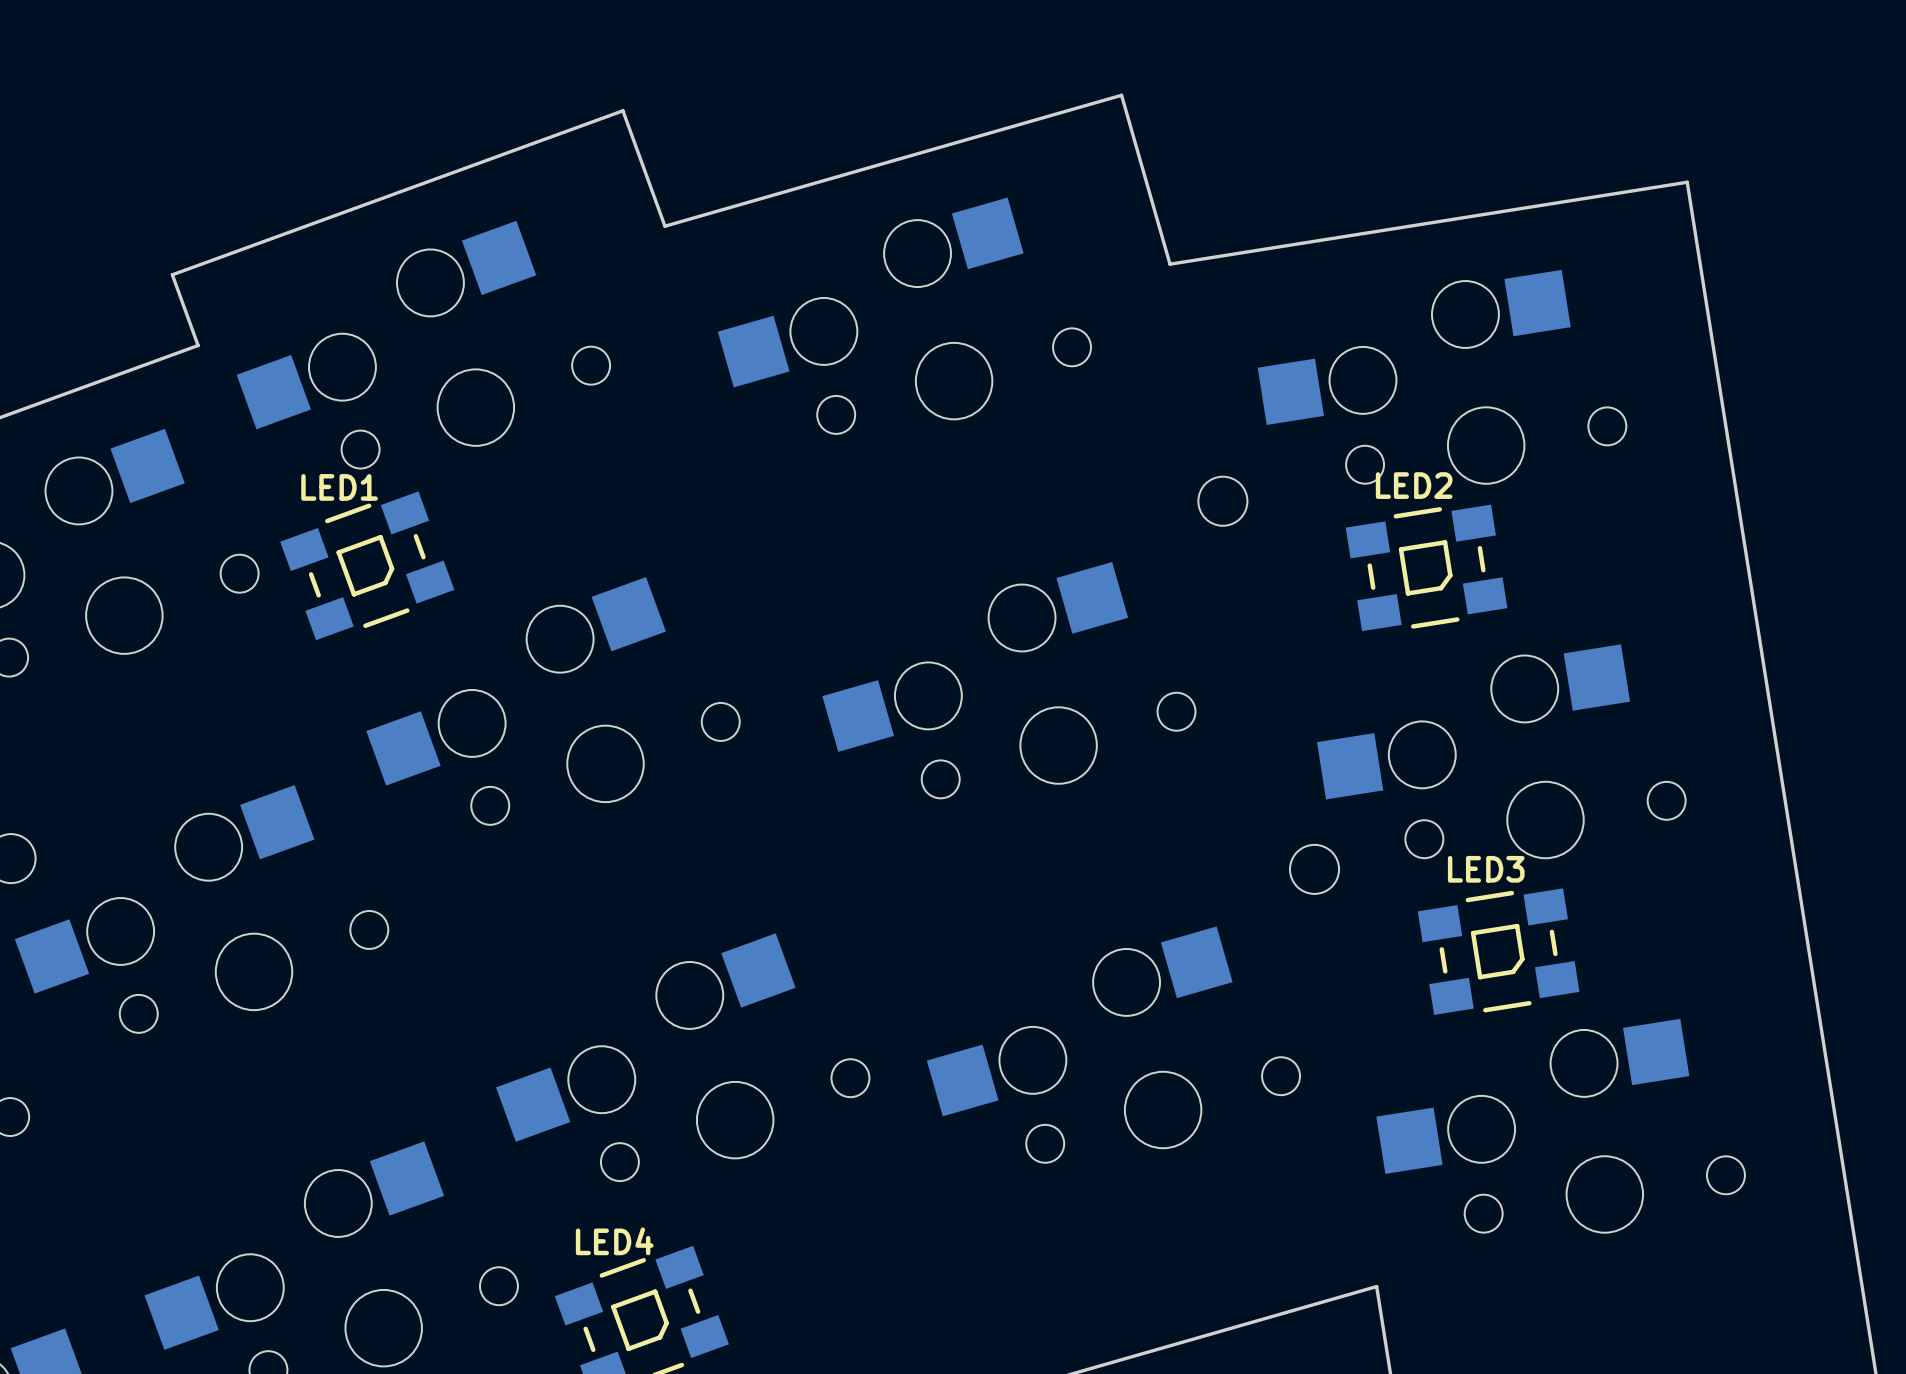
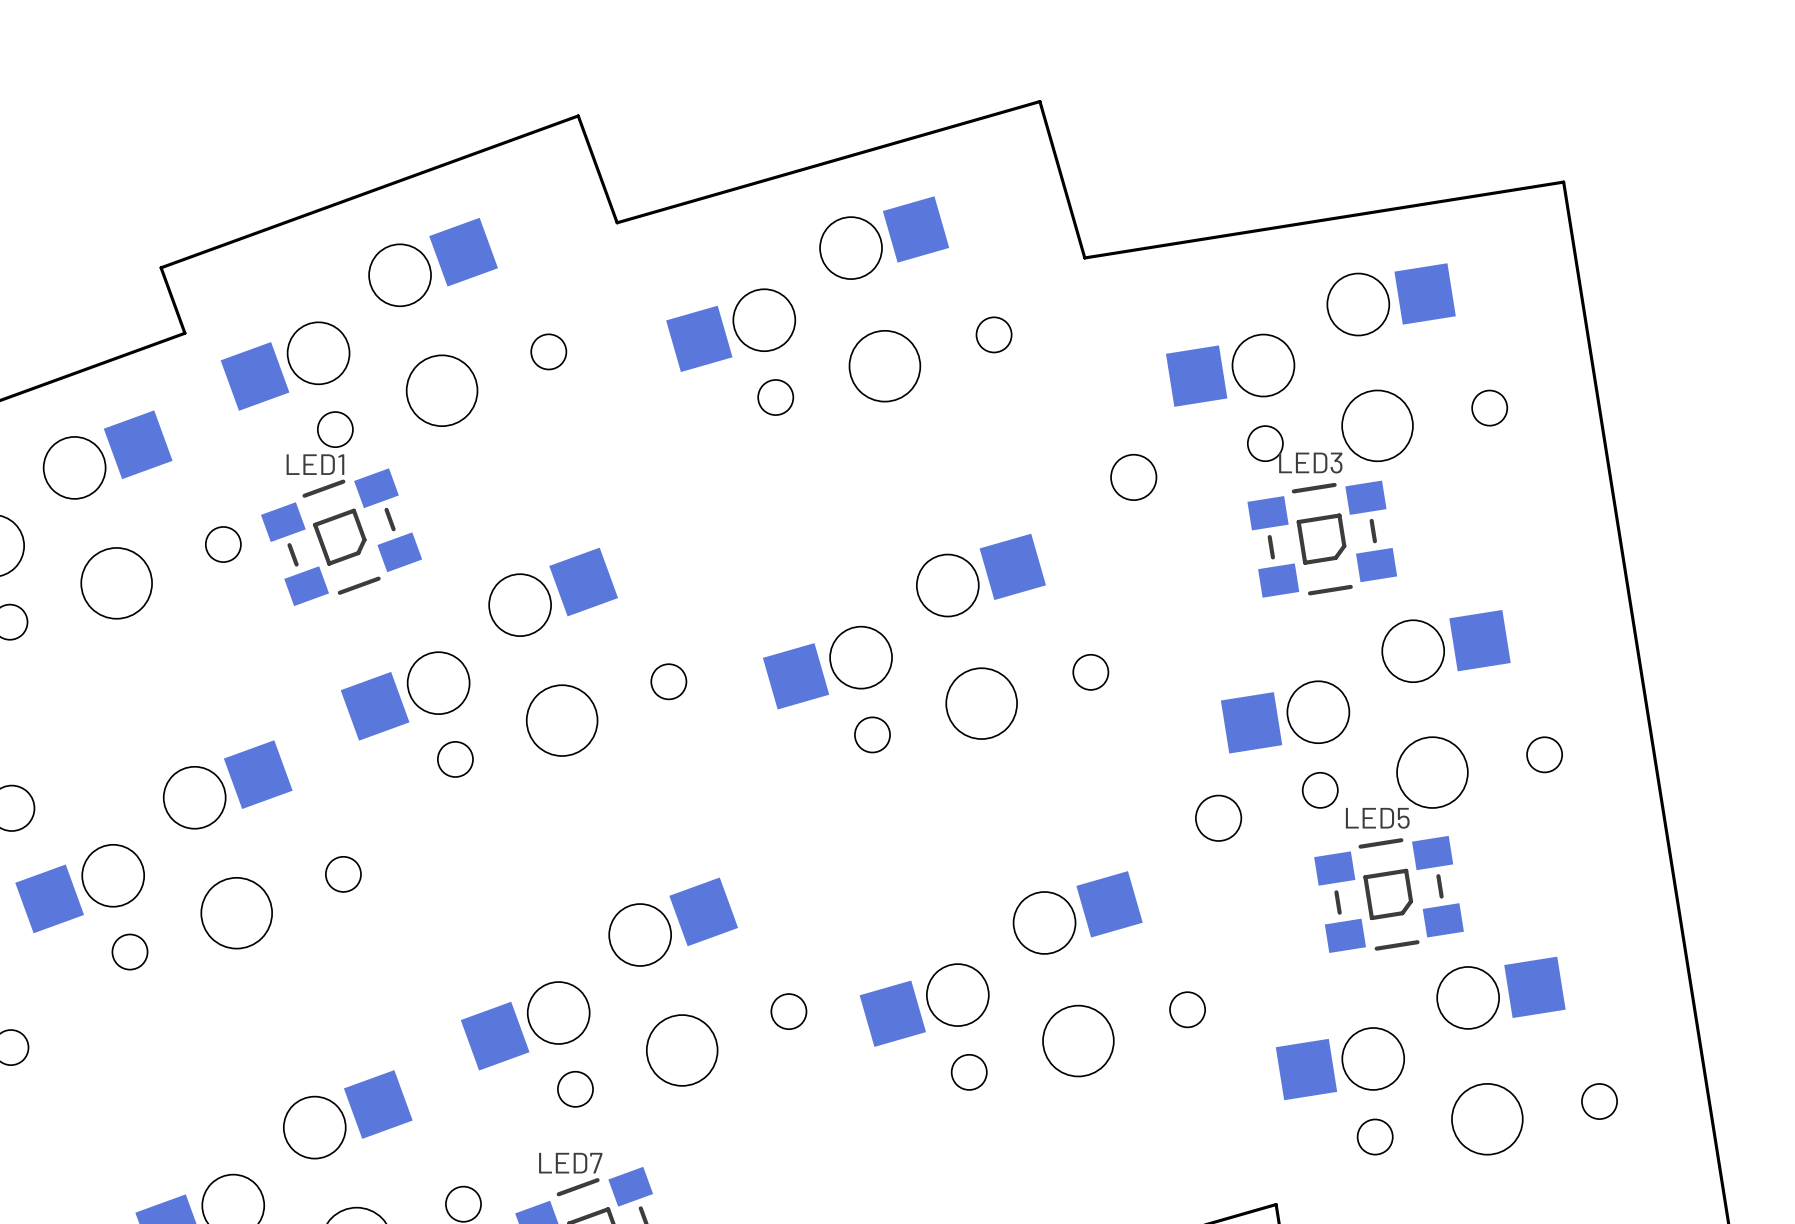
LED2 name: LED2 (1414, 485) -> LED3 (1310, 463)
LED3 name: LED3 (1486, 869) -> LED5 (1377, 818)
LED4 name: LED4 (614, 1241) -> LED7 (570, 1163)

